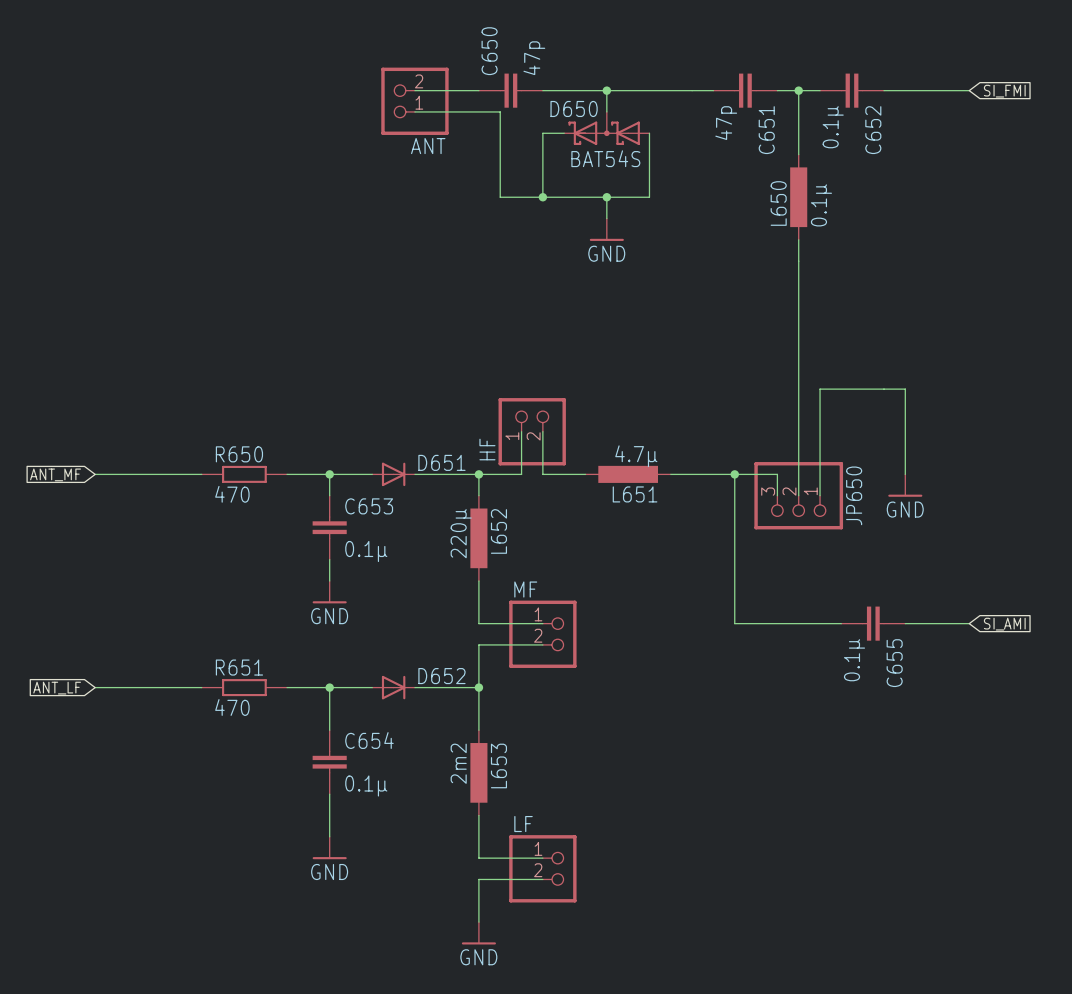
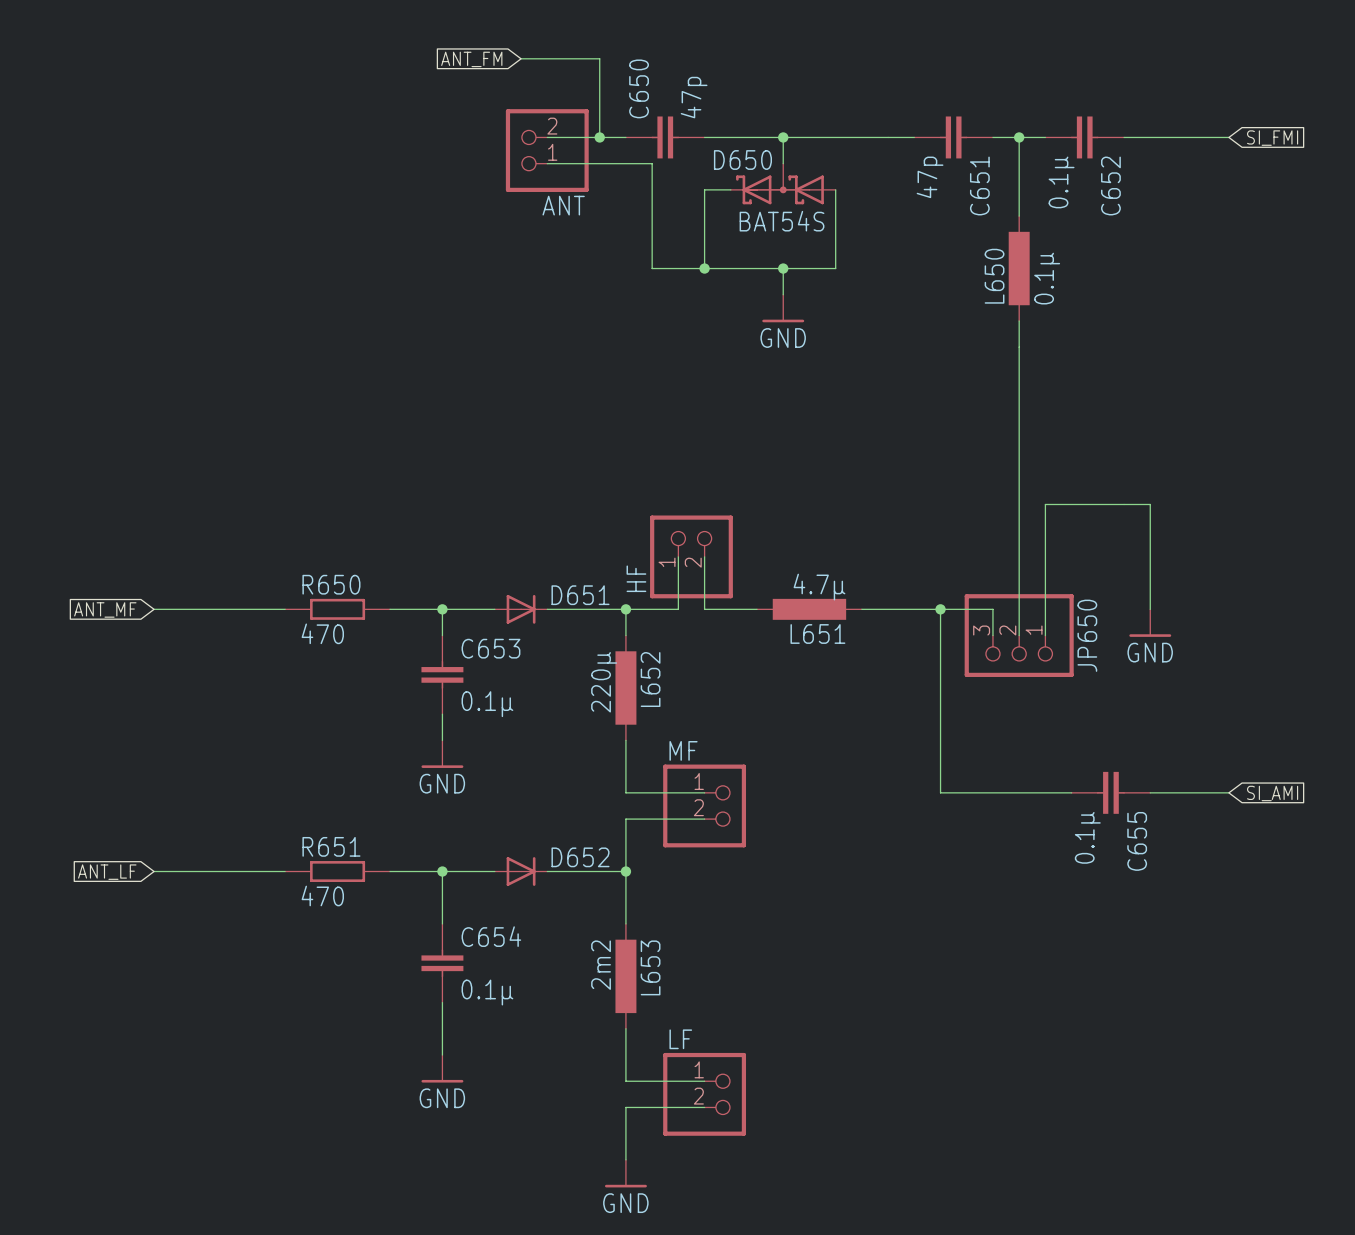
wire: none -> (521, 58) (599, 58) (599, 137)
global label: none -> ANT_FM (471, 59)
junction: none -> (599, 137)

